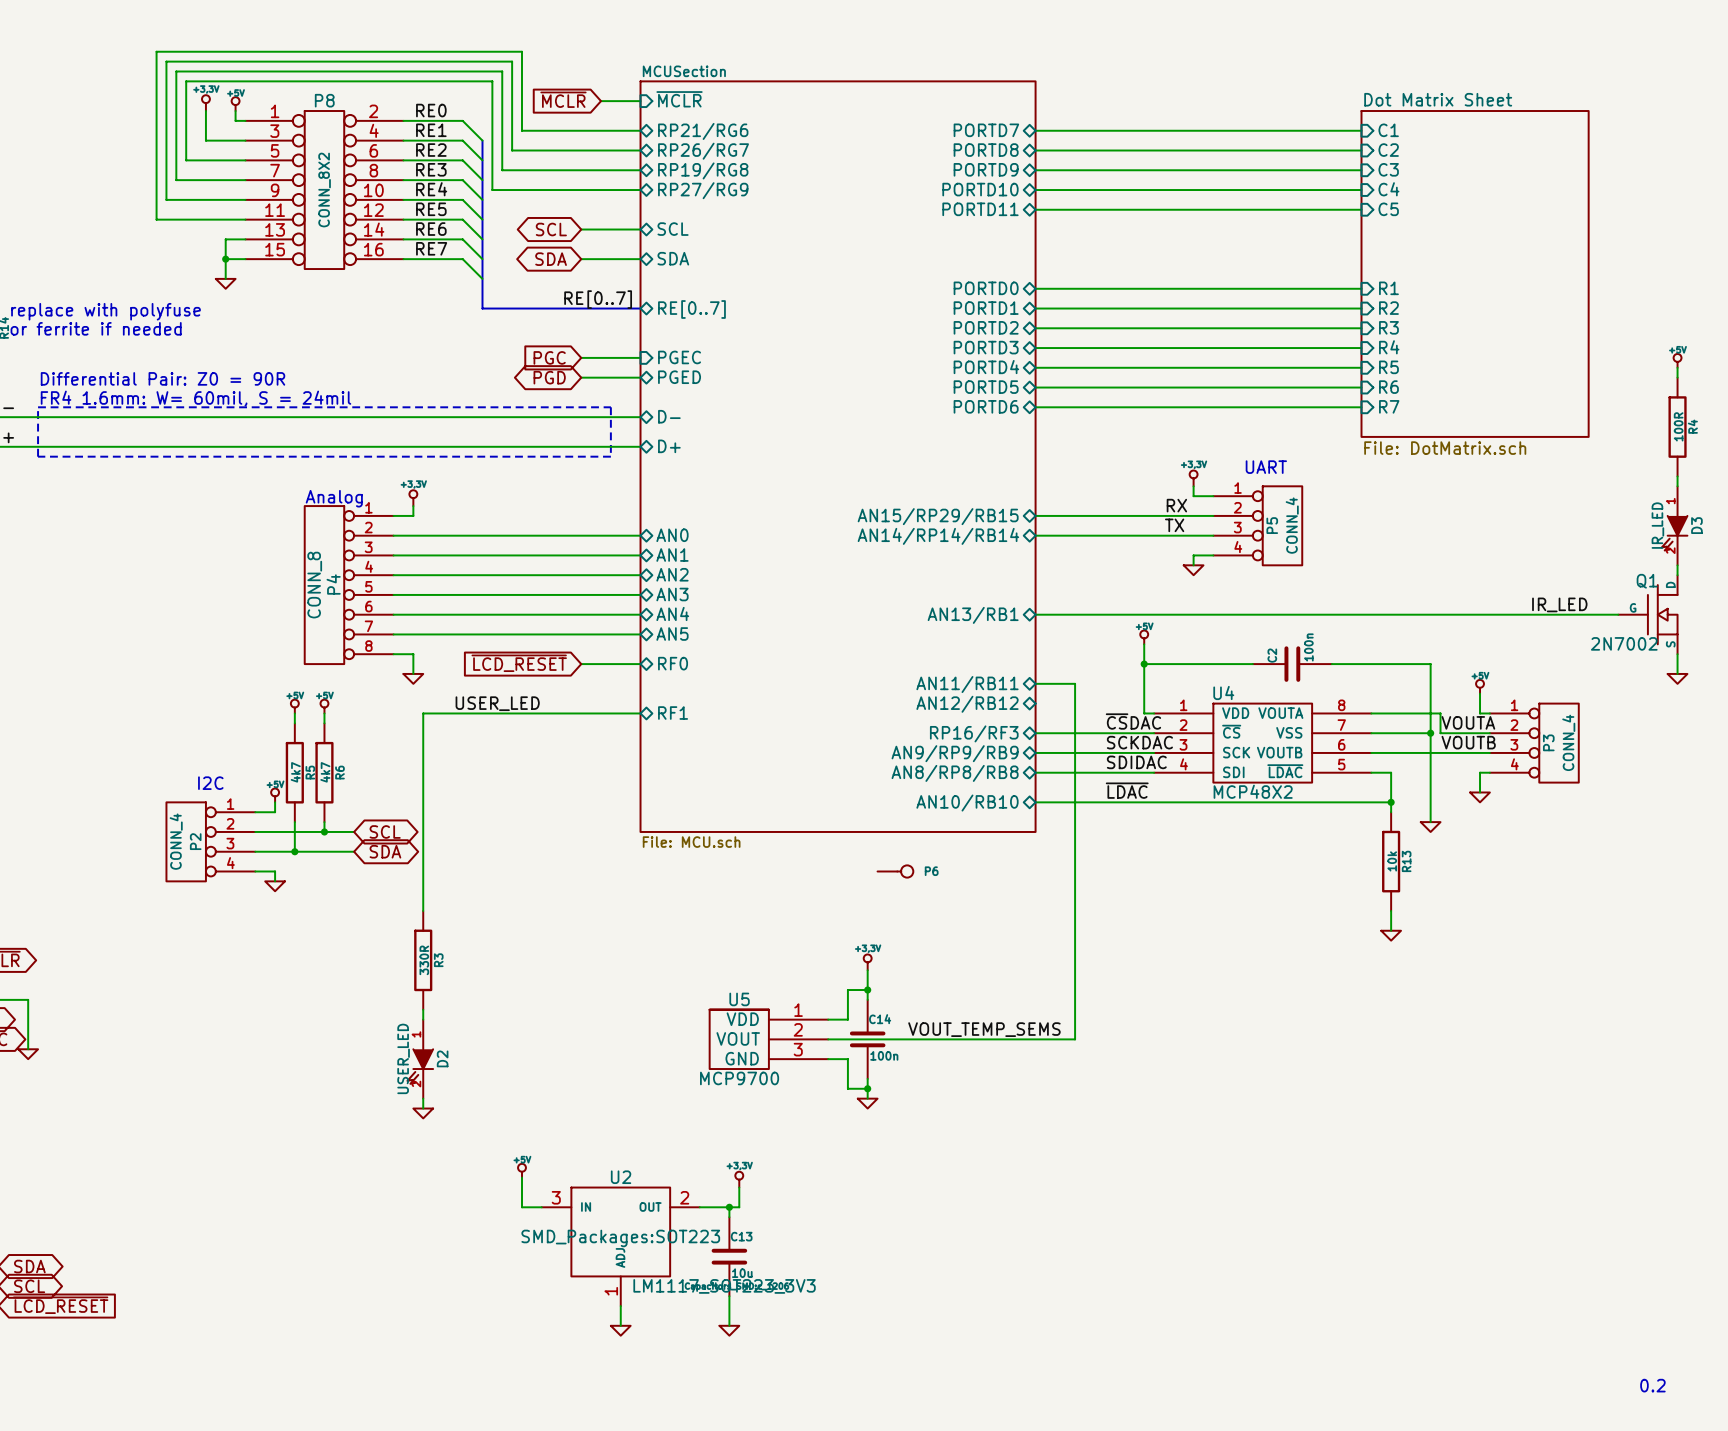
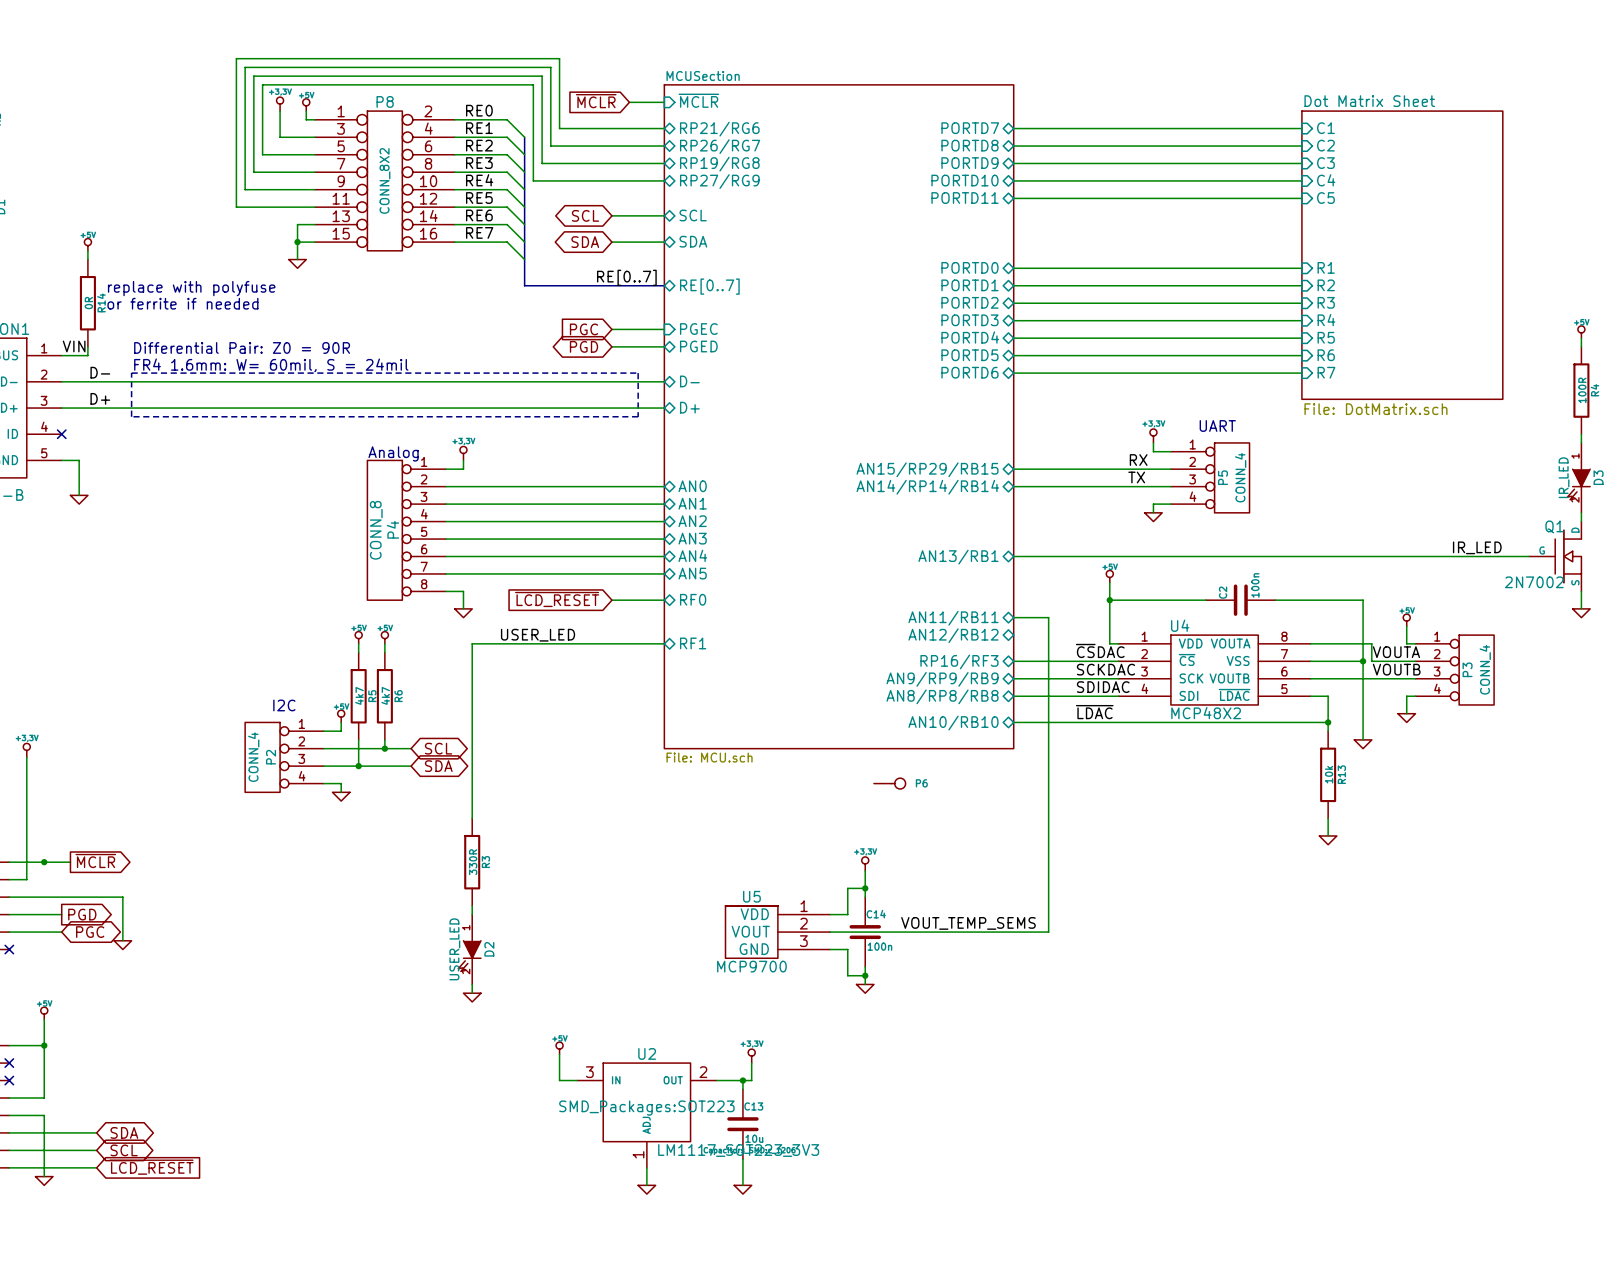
text: 0.2 (1652, 1385) -> none

